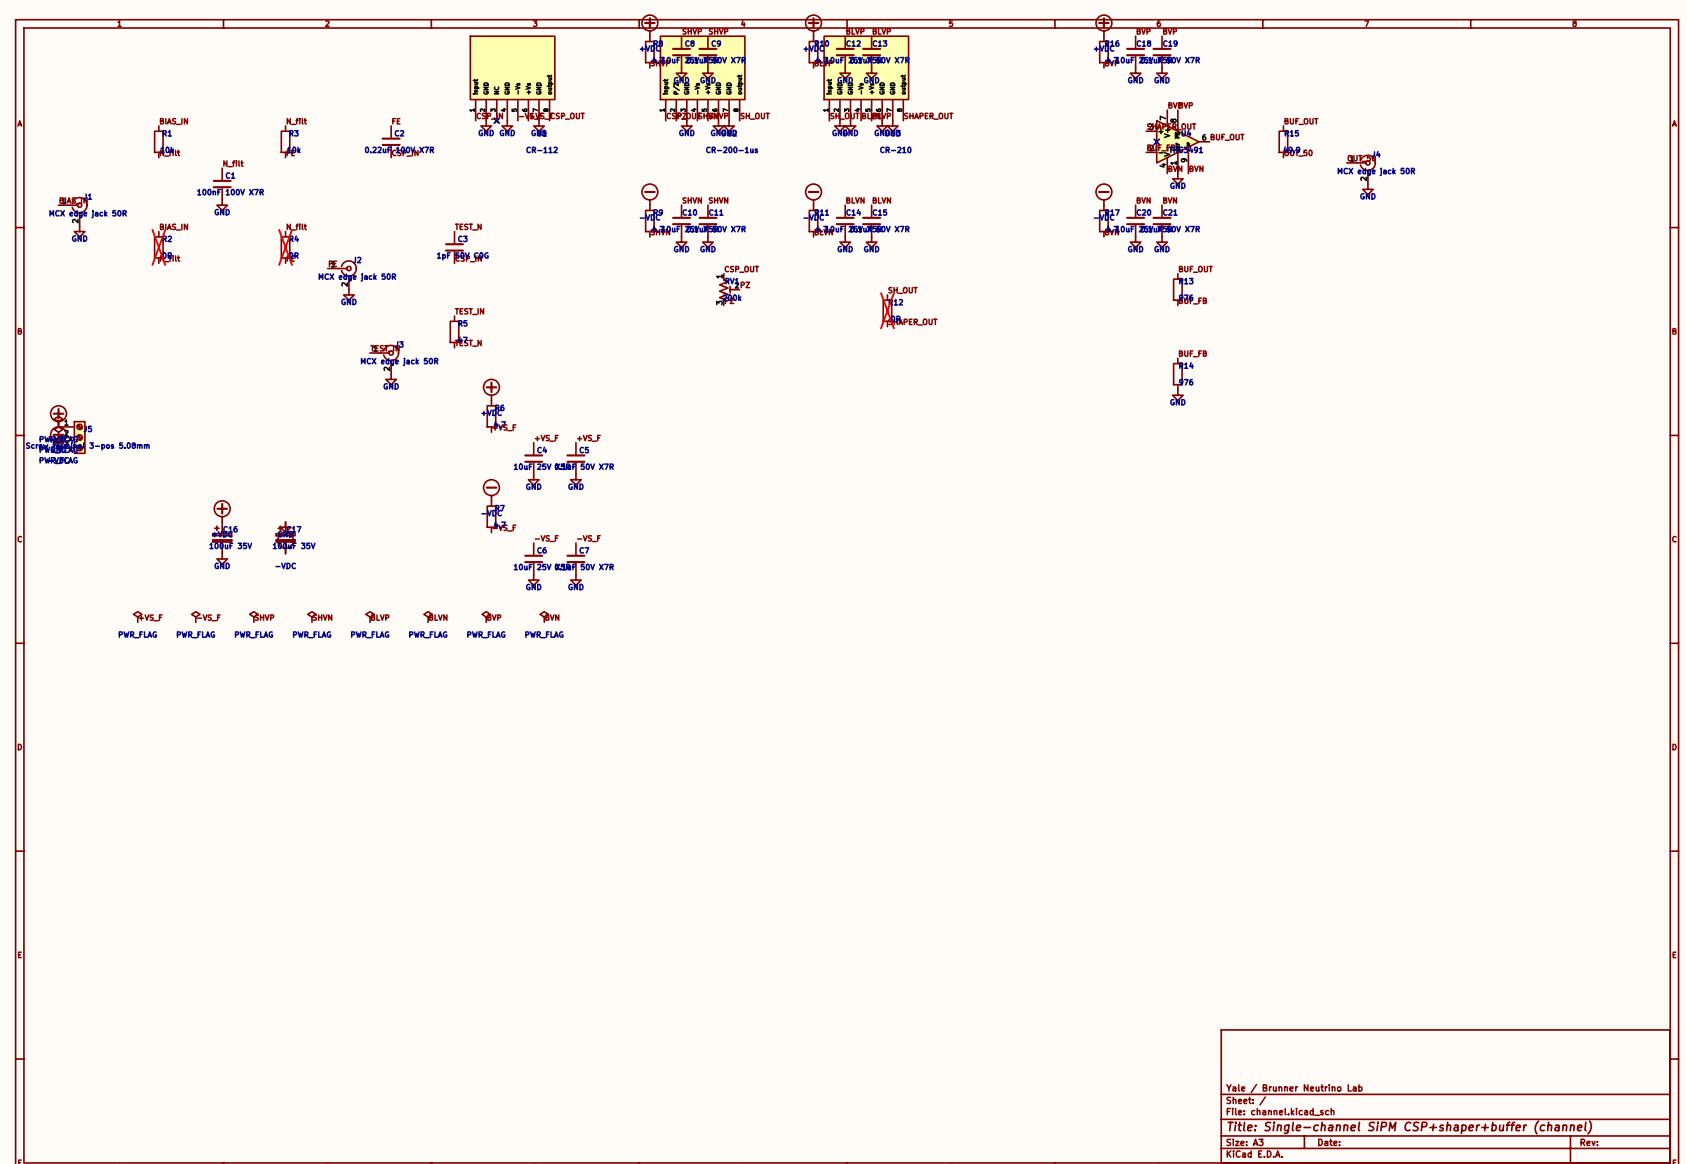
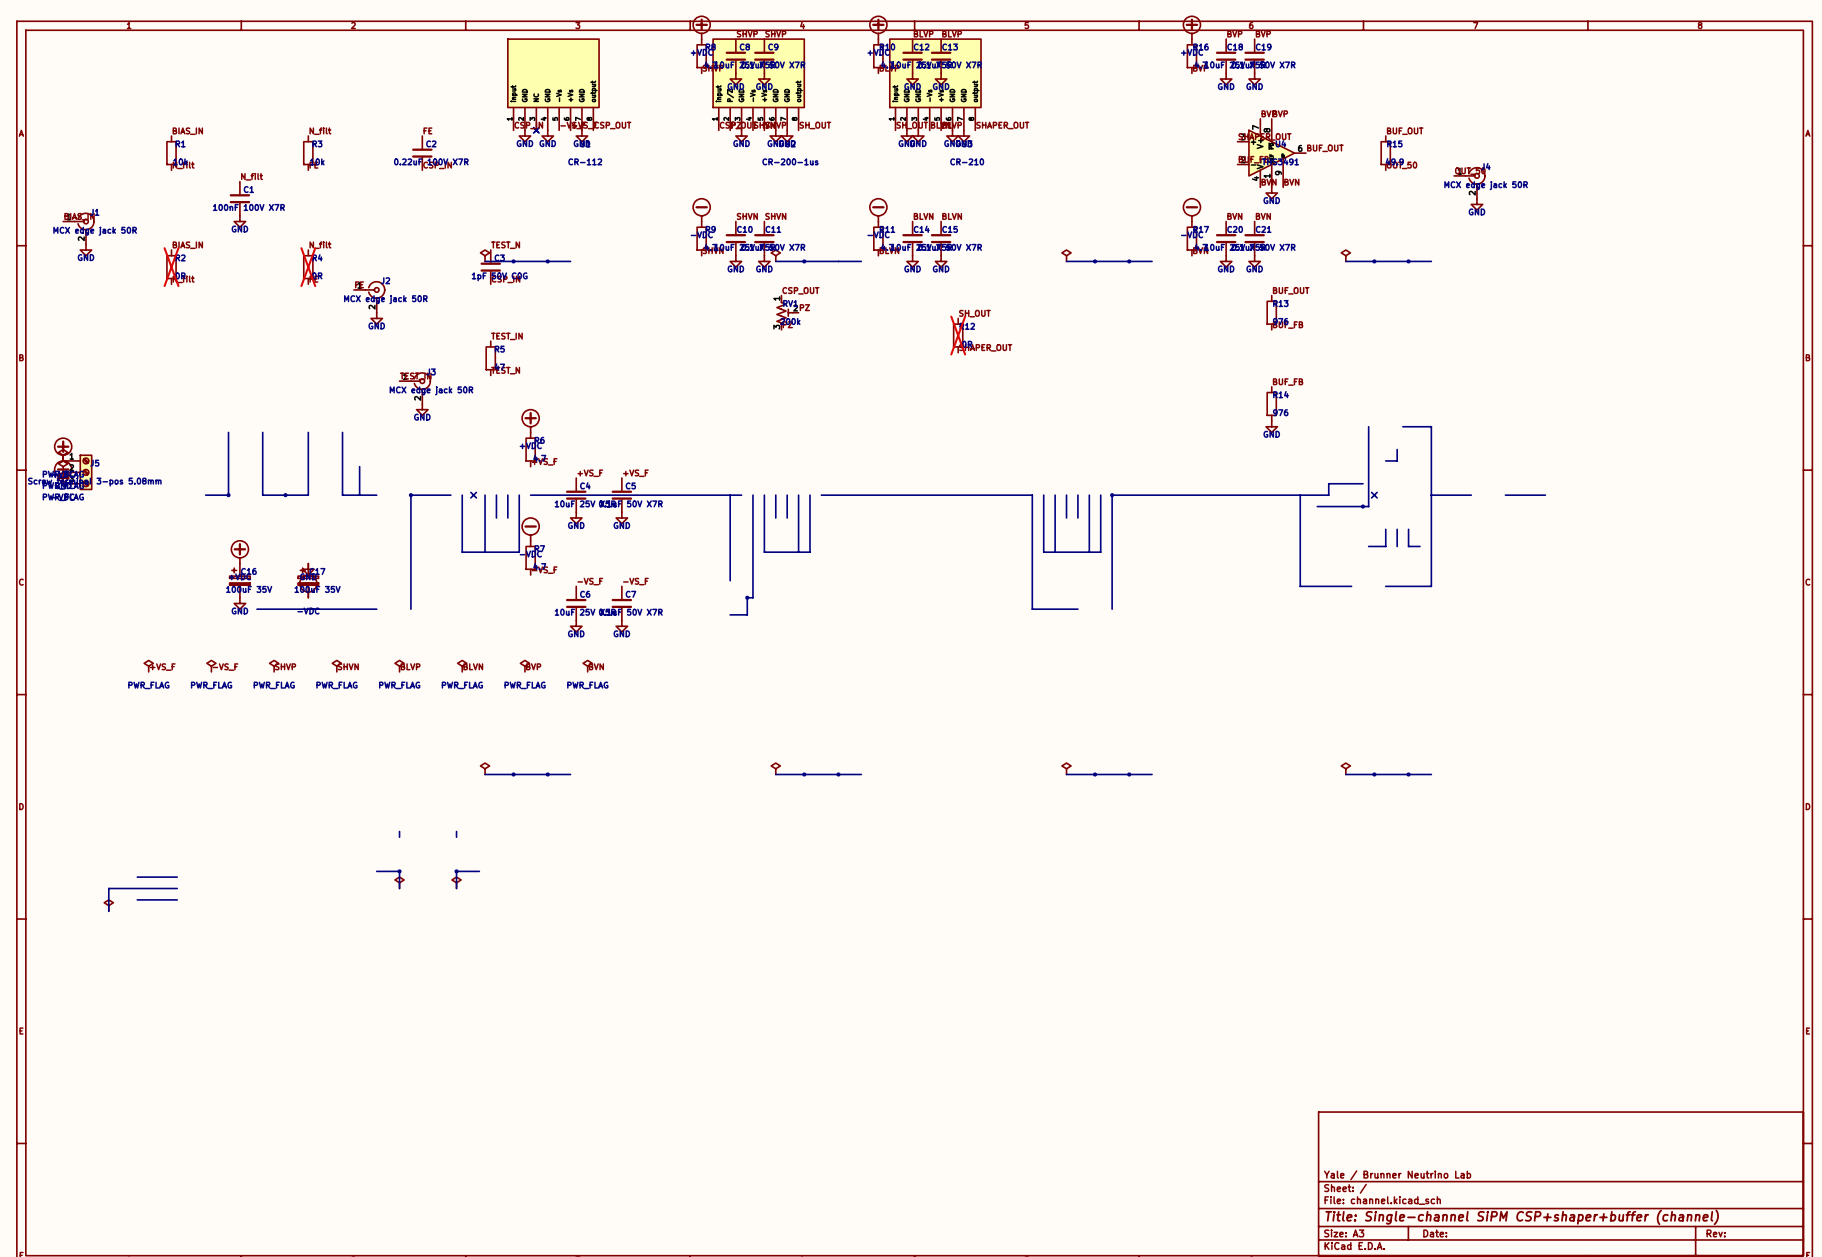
no-connect mark: (1156, 141) -> none
power symbol: none -> (485, 255)
power symbol: none -> (775, 255)
power symbol: none -> (1066, 255)
power symbol: none -> (1345, 255)
wire: none -> (485, 261) (570, 261)
junction: none -> (513, 261)
junction: none -> (547, 261)
wire: none -> (775, 261) (861, 261)
junction: none -> (804, 261)
wire: none -> (1066, 261) (1152, 261)
junction: none -> (1095, 261)
junction: none -> (1129, 261)
wire: none -> (1345, 261) (1431, 261)
junction: none -> (1374, 261)
junction: none -> (1408, 261)
wire: none -> (1368, 426) (1368, 506) (1317, 506)
wire: none -> (1402, 426) (1431, 426) (1431, 586) (1385, 586)
wire: none -> (228, 432) (228, 495) (205, 495)
wire: none -> (262, 432) (262, 495) (308, 495) (308, 432)
wire: none -> (342, 432) (342, 495) (376, 495)
wire: none -> (1397, 449) (1397, 460) (1385, 460)
wire: none -> (359, 466) (359, 495)
wire: none -> (1362, 483) (1328, 483) (1328, 495) (1112, 495) (1112, 609)
junction: none -> (228, 495)
junction: none -> (285, 495)
junction: none -> (410, 495)
wire: none -> (450, 495) (410, 495) (410, 609)
wire: none -> (462, 495) (462, 552) (519, 552) (519, 495)
no-connect mark: none -> (473, 495)
wire: none -> (485, 495) (485, 552)
wire: none -> (496, 495) (496, 517)
wire: none -> (507, 495) (507, 517)
wire: none -> (530, 495) (741, 495)
wire: none -> (730, 495) (730, 580)
wire: none -> (752, 495) (752, 597) (747, 597) (747, 614) (730, 614)
wire: none -> (764, 495) (764, 552) (809, 552) (809, 495)
wire: none -> (775, 495) (775, 517)
wire: none -> (787, 495) (787, 517)
wire: none -> (798, 495) (798, 552)
wire: none -> (821, 495) (1032, 495) (1032, 609) (1077, 609)
wire: none -> (1043, 495) (1043, 552) (1100, 552) (1100, 495)
wire: none -> (1055, 495) (1055, 552)
wire: none -> (1066, 495) (1066, 517)
wire: none -> (1077, 495) (1077, 517)
wire: none -> (1089, 495) (1089, 552)
junction: none -> (1112, 495)
wire: none -> (1300, 495) (1300, 586) (1351, 586)
no-connect mark: none -> (1374, 495)
wire: none -> (1431, 495) (1471, 495)
wire: none -> (1505, 495) (1545, 495)
junction: none -> (1362, 506)
wire: none -> (1385, 529) (1385, 546) (1368, 546)
wire: none -> (1397, 529) (1397, 546)
wire: none -> (1408, 529) (1408, 546) (1419, 546)
junction: none -> (747, 597)
wire: none -> (257, 609) (376, 609)
power symbol: none -> (485, 768)
power symbol: none -> (775, 768)
power symbol: none -> (1066, 768)
power symbol: none -> (1345, 768)
wire: none -> (485, 774) (570, 774)
junction: none -> (513, 774)
junction: none -> (547, 774)
wire: none -> (775, 774) (861, 774)
junction: none -> (804, 774)
junction: none -> (838, 774)
wire: none -> (1066, 774) (1152, 774)
junction: none -> (1095, 774)
junction: none -> (1129, 774)
wire: none -> (1345, 774) (1431, 774)
junction: none -> (1374, 774)
junction: none -> (1408, 774)
wire: none -> (399, 831) (399, 837)
wire: none -> (456, 831) (456, 837)
wire: none -> (376, 871) (399, 871) (399, 888)
junction: none -> (399, 871)
junction: none -> (456, 871)
wire: none -> (479, 871) (456, 871) (456, 888)
wire: none -> (137, 877) (177, 877)
power symbol: none -> (399, 882)
power symbol: none -> (456, 882)
wire: none -> (177, 888) (108, 888) (108, 911)
wire: none -> (137, 899) (177, 899)
power symbol: none -> (108, 905)

